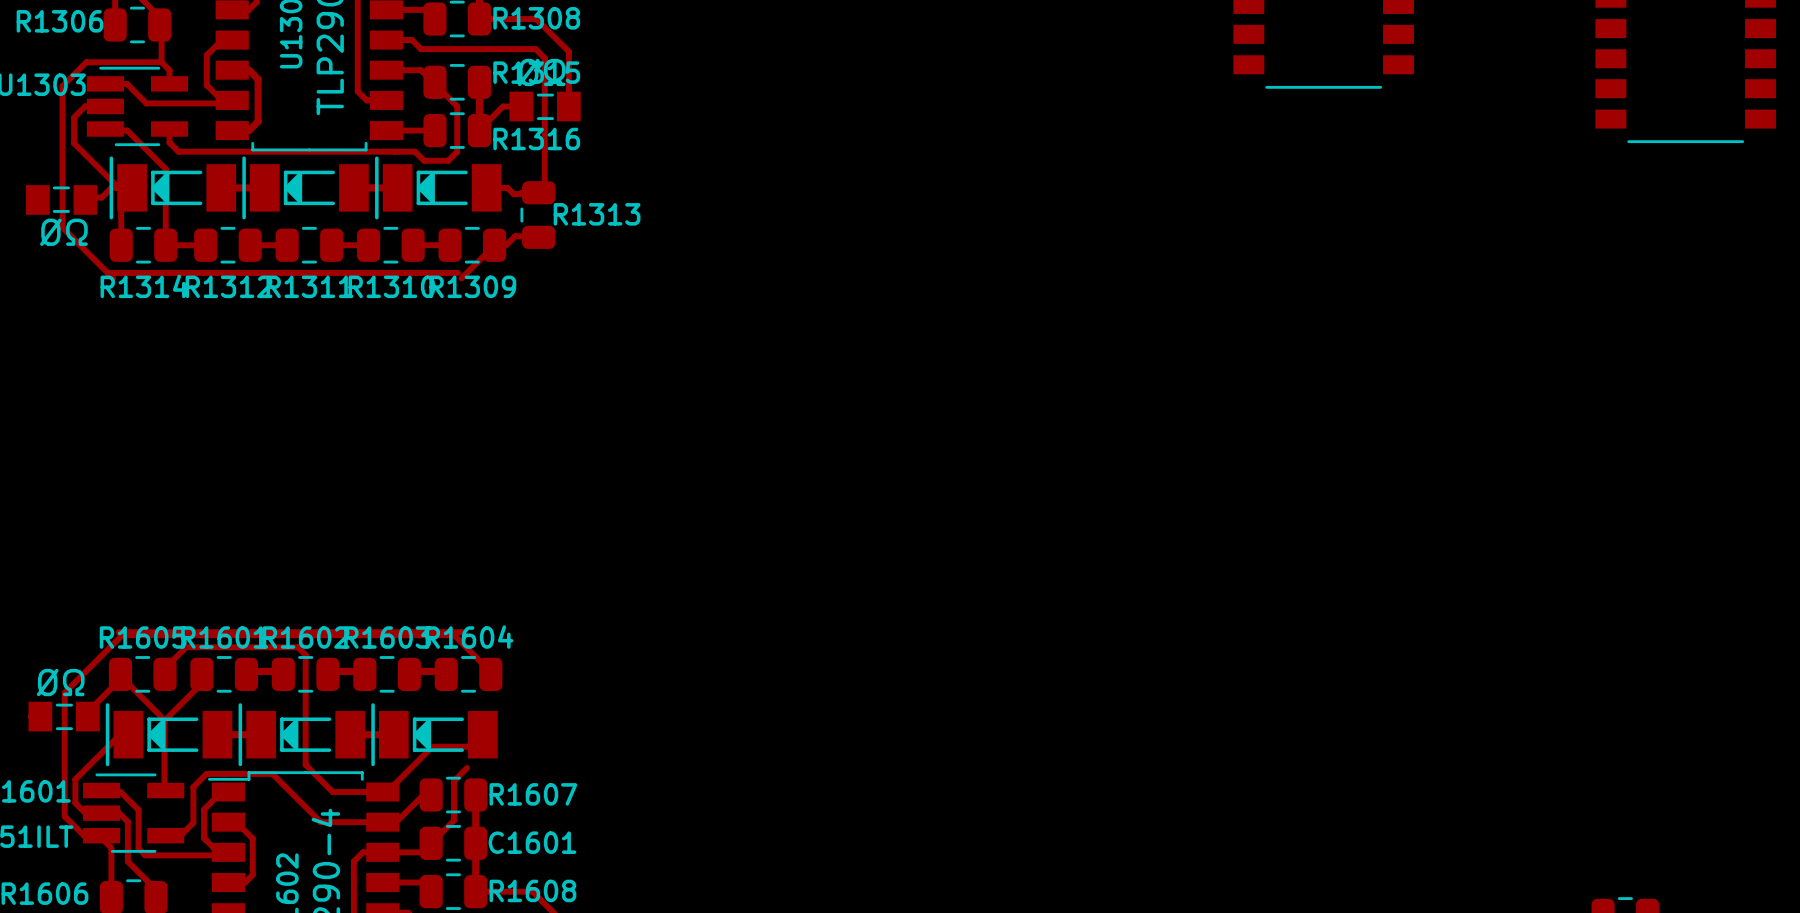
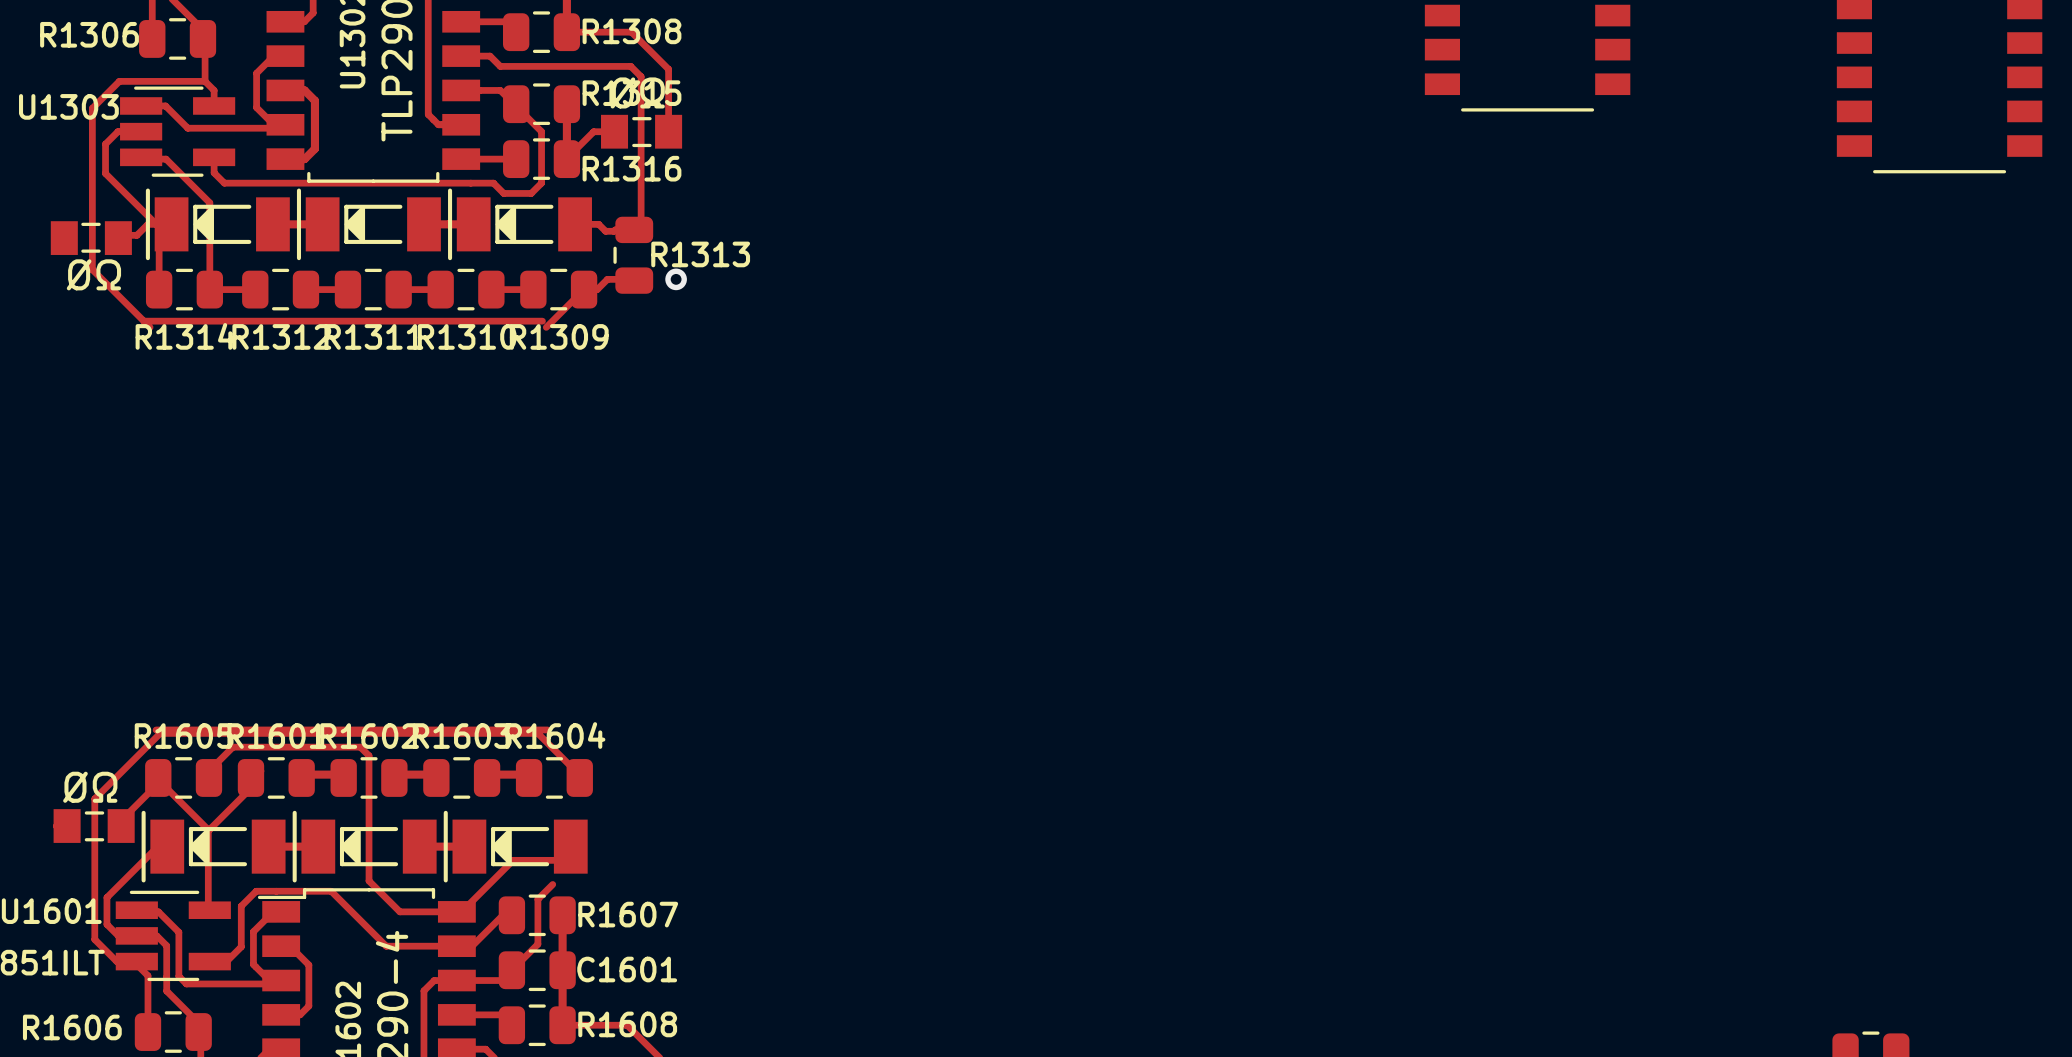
via: none -> (676, 279)

